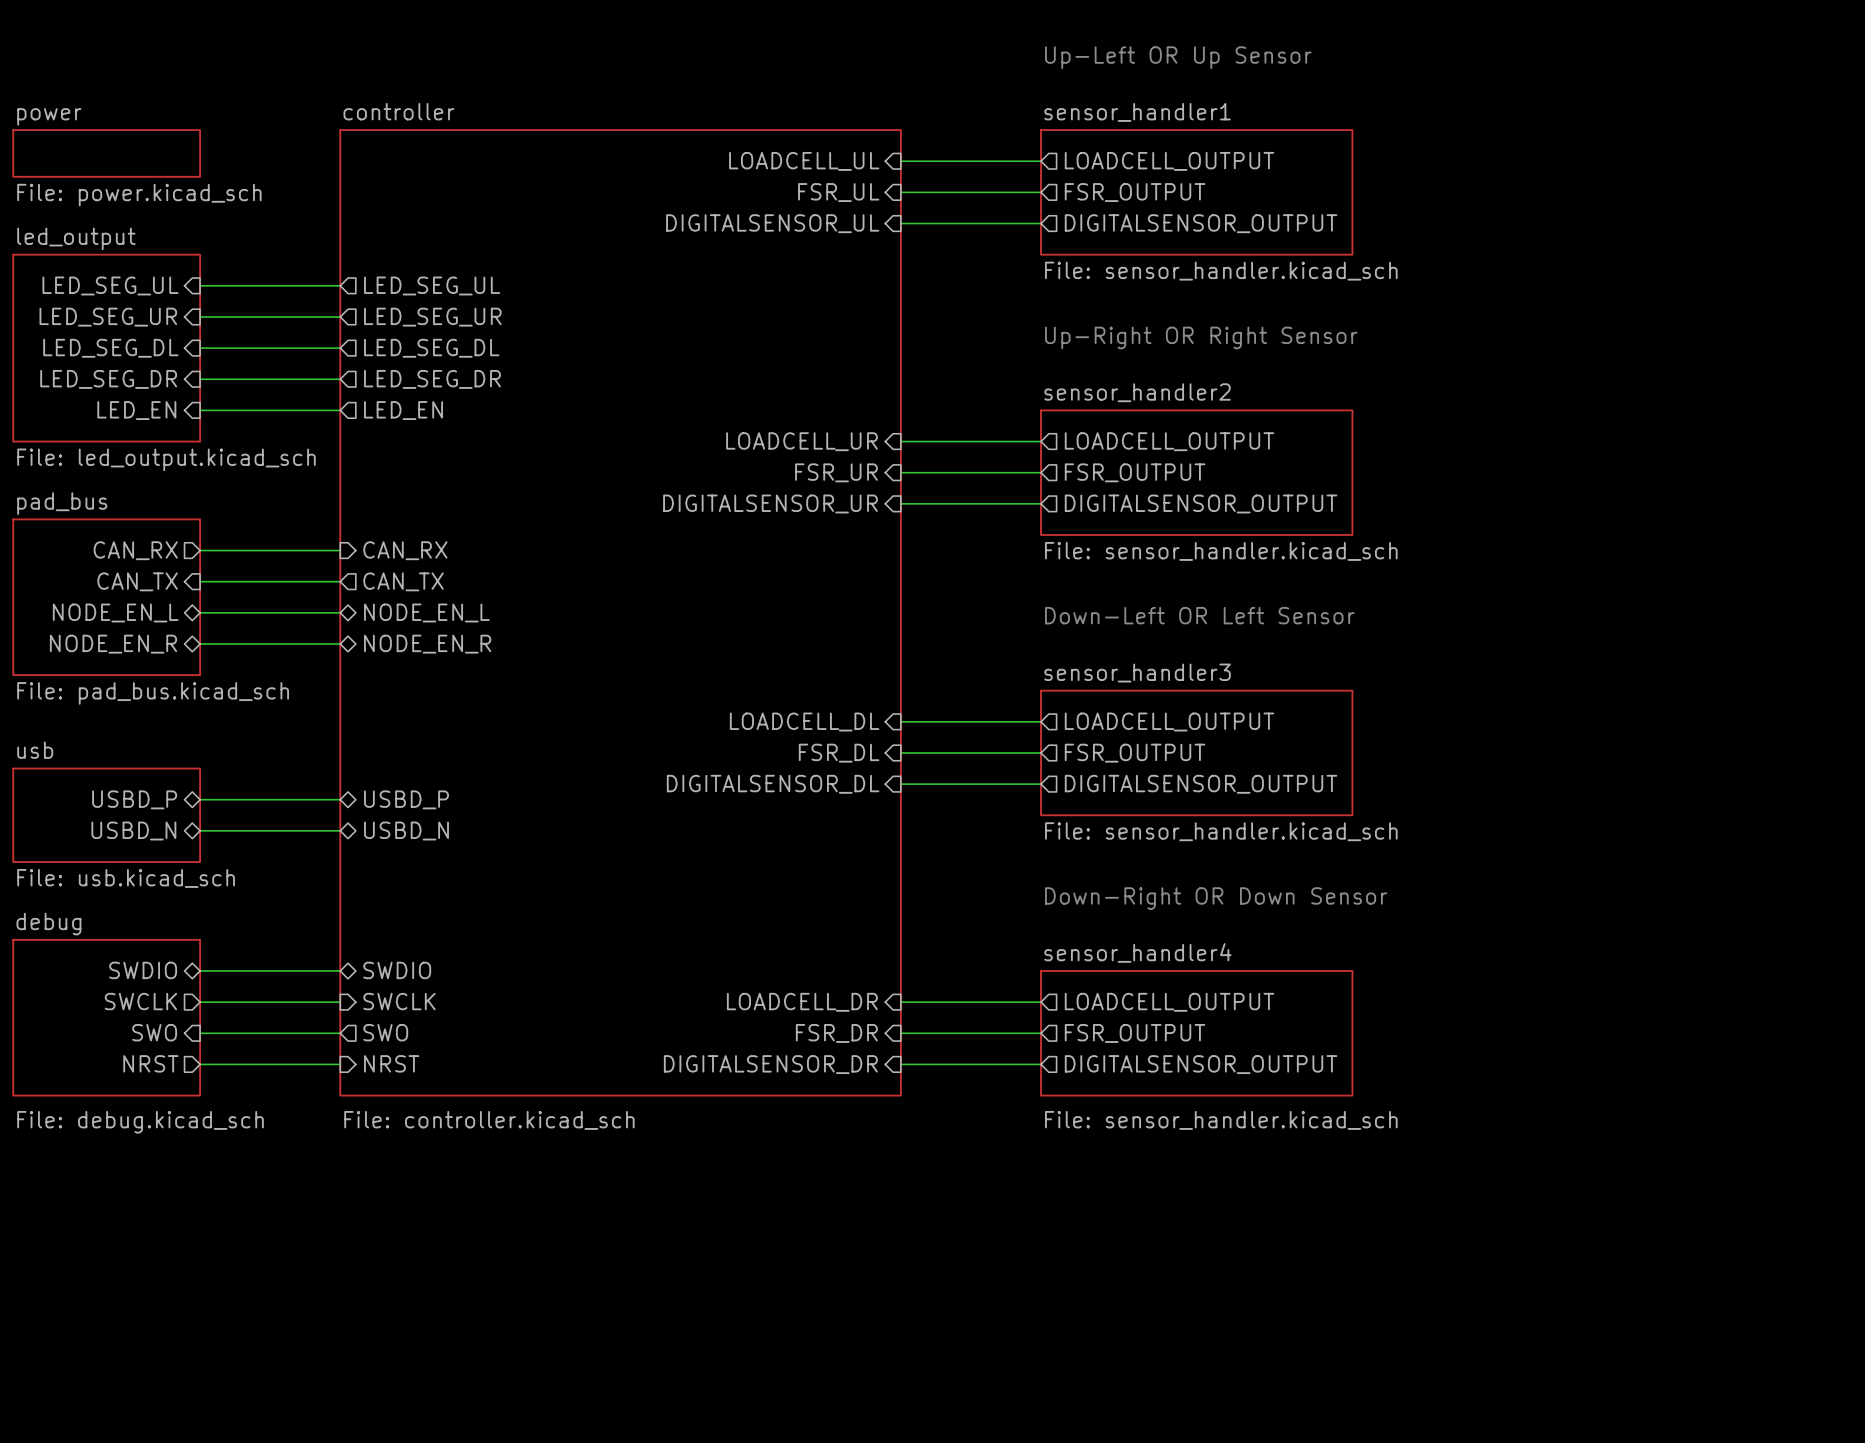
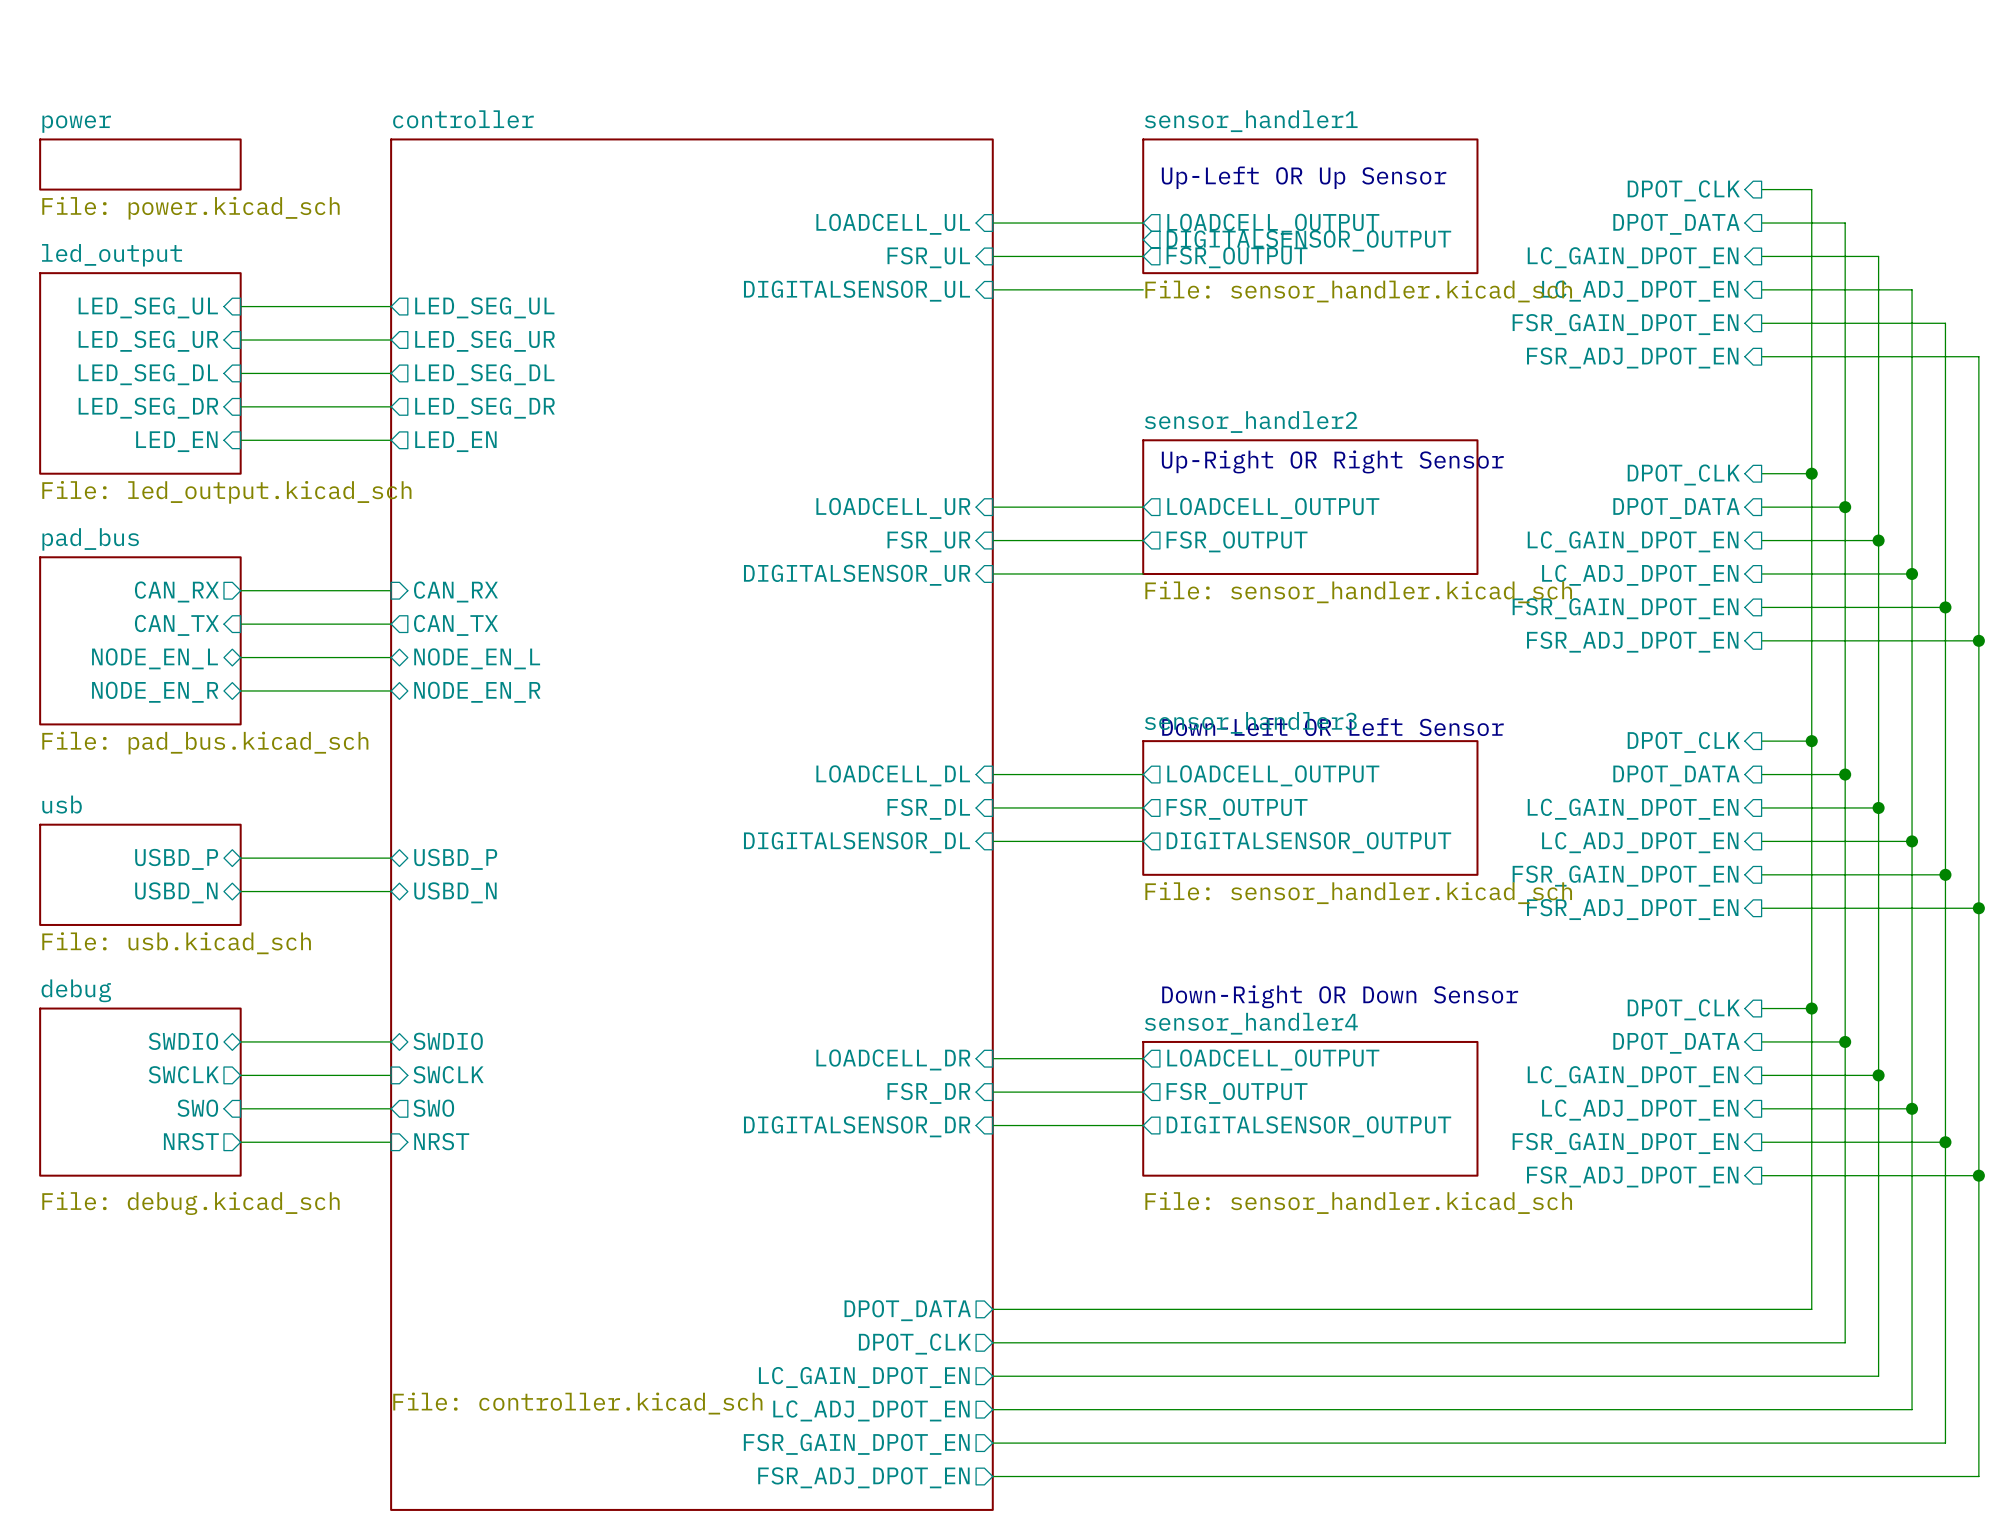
text position: Up-Left OR Up Sensor (1178, 57) -> Up-Left OR Up Sensor (1304, 177)
sheet pin position: LOADCELL_UL (804, 161) -> LOADCELL_UL (893, 224)
wire: (900, 161) (1041, 161) -> (992, 289) (1143, 289)
sheet pin position: LOADCELL_OUTPUT (1169, 161) -> LOADCELL_OUTPUT (1273, 224)
sheet pin: none -> DPOT_CLK (1683, 190)
wire: none -> (1761, 189) (1811, 189) (1811, 1309) (992, 1309)
sheet pin position: FSR_UL (838, 192) -> FSR_UL (928, 257)
wire: (900, 192) (1041, 192) -> (992, 256) (1143, 256)
sheet pin position: FSR_OUTPUT (1135, 192) -> FSR_OUTPUT (1237, 257)
wire: none -> (1761, 223) (1845, 223) (1845, 1342) (992, 1342)
sheet pin: none -> DPOT_DATA (1676, 224)
sheet pin position: DIGITALSENSOR_UL (772, 223) -> DIGITALSENSOR_UL (856, 291)
wire: (900, 223) (1041, 223) -> (992, 223) (1143, 223)
sheet pin: none -> LC_GAIN_DPOT_EN (1633, 257)
wire: none -> (1761, 256) (1878, 256) (1878, 1376) (992, 1376)
sheet pin: none -> LC_ADJ_DPOT_EN (1640, 291)
wire: none -> (1761, 289) (1912, 289) (1912, 1409) (992, 1409)
sheet pin: none -> FSR_GAIN_DPOT_EN (1625, 324)
wire: none -> (1761, 323) (1945, 323) (1945, 1443) (992, 1443)
sheet pin: none -> FSR_ADJ_DPOT_EN (1632, 357)
wire: none -> (1761, 356) (1978, 356) (1978, 1476) (992, 1476)
text position: Up-Right OR Right Sensor (1201, 337) -> Up-Right OR Right Sensor (1332, 461)
sheet pin: LOADCELL_UR (801, 441) -> none
wire: (900, 441) (1041, 441) -> (992, 573) (1143, 573)
sheet pin: LOADCELL_OUTPUT (1169, 441) -> none
sheet pin: none -> DPOT_CLK (1683, 474)
wire: none -> (1761, 473) (1811, 473)
junction: none -> (1811, 473)
sheet pin: FSR_UR (836, 472) -> LOADCELL_UR (893, 508)
sheet pin: FSR_OUTPUT (1135, 472) -> LOADCELL_OUTPUT (1273, 508)
sheet pin: none -> DPOT_DATA (1676, 508)
wire: none -> (1761, 507) (1845, 507)
junction: none -> (1845, 507)
sheet pin: DIGITALSENSOR_UR (770, 503) -> FSR_UR (928, 541)
sheet pin: DIGITALSENSOR_OUTPUT (1201, 503) -> FSR_OUTPUT (1237, 541)
sheet pin: none -> LC_GAIN_DPOT_EN (1633, 541)
wire: none -> (1761, 540) (1878, 540)
junction: none -> (1878, 540)
wire: none -> (1761, 573) (1912, 573)
junction: none -> (1912, 573)
sheet pin: none -> DIGITALSENSOR_UR (857, 575)
sheet pin: none -> LC_ADJ_DPOT_EN (1640, 575)
sheet pin: none -> FSR_GAIN_DPOT_EN (1625, 608)
wire: none -> (1761, 607) (1945, 607)
junction: none -> (1945, 607)
sheet pin: none -> FSR_ADJ_DPOT_EN (1632, 642)
wire: none -> (1761, 640) (1978, 640)
junction: none -> (1978, 640)
sheet controller: File: controller.kicad_sch (620, 612) -> none
text position: Down-Left OR Left Sensor (1199, 615) -> Down-Left OR Left Sensor (1332, 727)
sheet pin: none -> DPOT_CLK (1683, 742)
wire: none -> (1761, 741) (1811, 741)
junction: none -> (1811, 741)
wire: none -> (1761, 774) (1845, 774)
junction: none -> (1845, 774)
sheet pin: none -> DPOT_DATA (1676, 775)
wire: none -> (1761, 807) (1878, 807)
junction: none -> (1878, 807)
sheet pin: none -> LC_GAIN_DPOT_EN (1633, 809)
sheet controller: none -> File: controller.kicad_sch (691, 824)
sheet pin: none -> LC_ADJ_DPOT_EN (1640, 842)
wire: none -> (1761, 841) (1912, 841)
junction: none -> (1912, 841)
sheet pin: none -> FSR_GAIN_DPOT_EN (1625, 876)
wire: none -> (1761, 874) (1945, 874)
junction: none -> (1945, 874)
sheet pin: none -> FSR_ADJ_DPOT_EN (1632, 909)
wire: none -> (1761, 908) (1978, 908)
junction: none -> (1978, 908)
text position: Down-Right OR Down Sensor (1216, 898) -> Down-Right OR Down Sensor (1340, 996)
wire: none -> (1761, 1008) (1811, 1008)
junction: none -> (1811, 1008)
sheet pin: none -> DPOT_CLK (1683, 1009)
sheet pin: none -> DPOT_DATA (1676, 1043)
wire: none -> (1761, 1041) (1845, 1041)
junction: none -> (1845, 1041)
sheet pin position: LOADCELL_DR (802, 1002) -> LOADCELL_DR (893, 1059)
wire: (900, 1002) (1041, 1002) -> (992, 1092) (1143, 1092)
sheet pin position: LOADCELL_OUTPUT (1169, 1002) -> LOADCELL_OUTPUT (1273, 1059)
sheet pin: none -> LC_GAIN_DPOT_EN (1633, 1076)
wire: none -> (1761, 1075) (1878, 1075)
junction: none -> (1878, 1075)
sheet pin position: FSR_DR (836, 1033) -> FSR_DR (928, 1093)
wire: (900, 1033) (1041, 1033) -> (992, 1125) (1143, 1125)
sheet pin position: FSR_OUTPUT (1135, 1033) -> FSR_OUTPUT (1237, 1093)
sheet pin: none -> LC_ADJ_DPOT_EN (1640, 1110)
wire: none -> (1761, 1108) (1912, 1108)
junction: none -> (1912, 1108)
sheet pin position: DIGITALSENSOR_DR (770, 1064) -> DIGITALSENSOR_DR (857, 1126)
wire: (900, 1064) (1041, 1064) -> (992, 1058) (1143, 1058)
sheet pin position: DIGITALSENSOR_OUTPUT (1201, 1064) -> DIGITALSENSOR_OUTPUT (1308, 1126)
sheet pin: none -> FSR_GAIN_DPOT_EN (1625, 1143)
wire: none -> (1761, 1142) (1945, 1142)
junction: none -> (1945, 1142)
sheet pin: none -> FSR_ADJ_DPOT_EN (1632, 1176)
wire: none -> (1761, 1175) (1978, 1175)
junction: none -> (1978, 1175)
sheet pin: none -> DPOT_DATA (907, 1310)
sheet pin: none -> DPOT_CLK (914, 1344)
sheet pin: none -> LC_GAIN_DPOT_EN (864, 1377)
sheet pin: none -> LC_ADJ_DPOT_EN (871, 1410)
sheet pin: none -> FSR_GAIN_DPOT_EN (856, 1444)
sheet pin: none -> FSR_ADJ_DPOT_EN (863, 1477)

